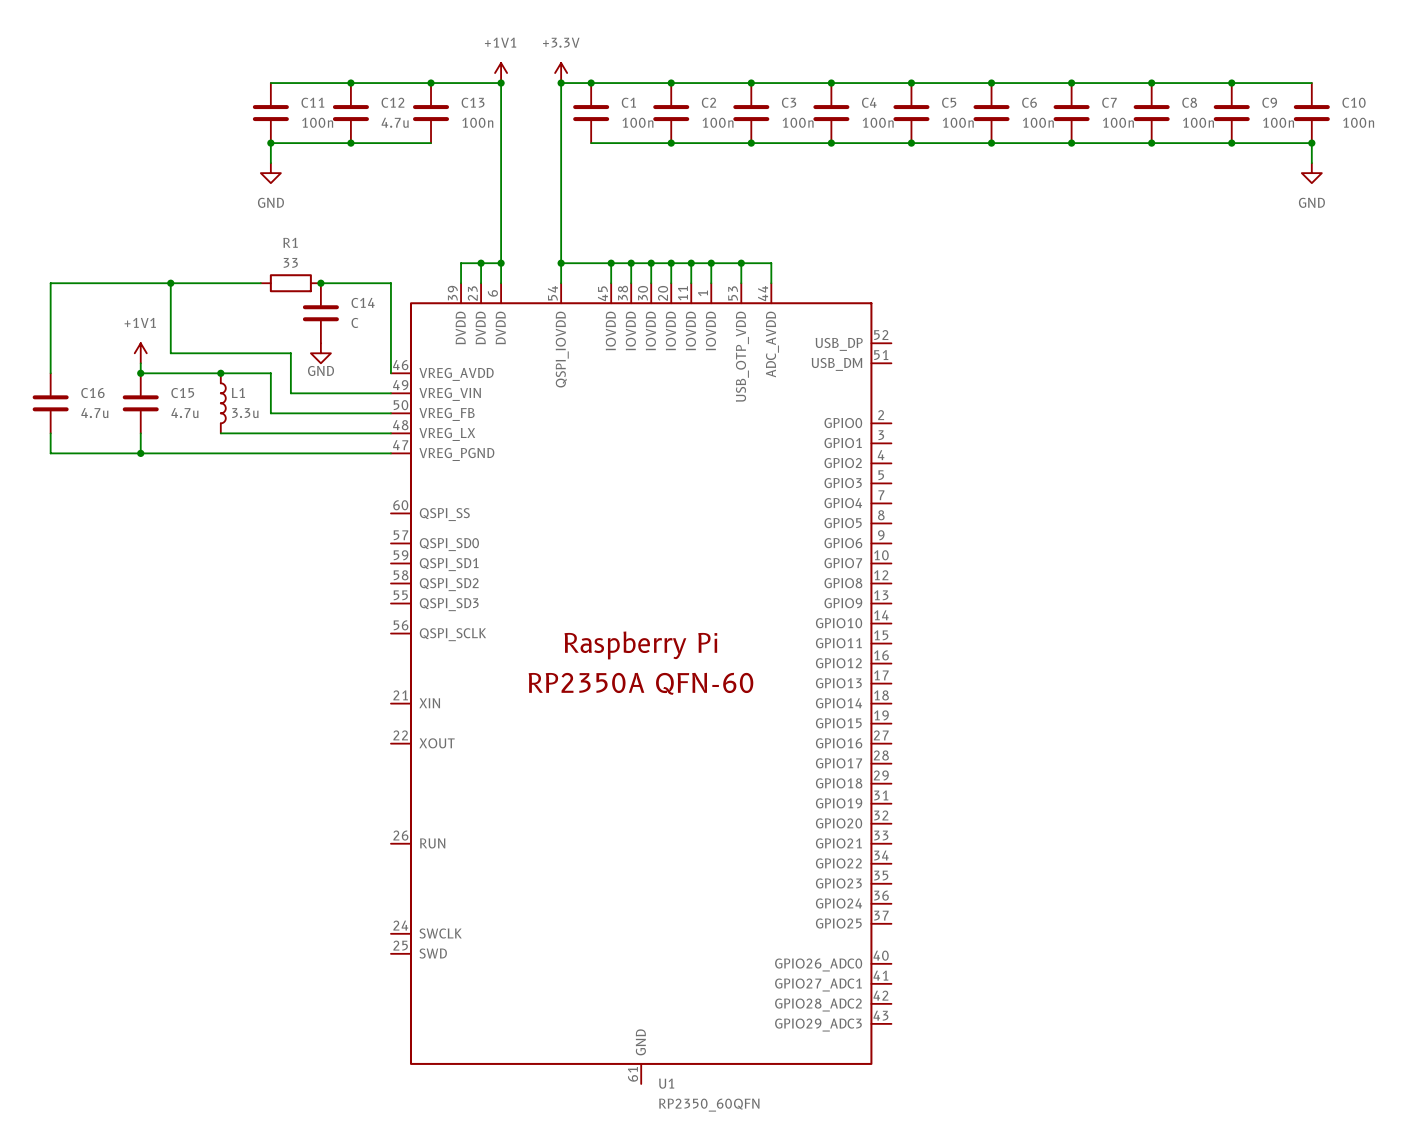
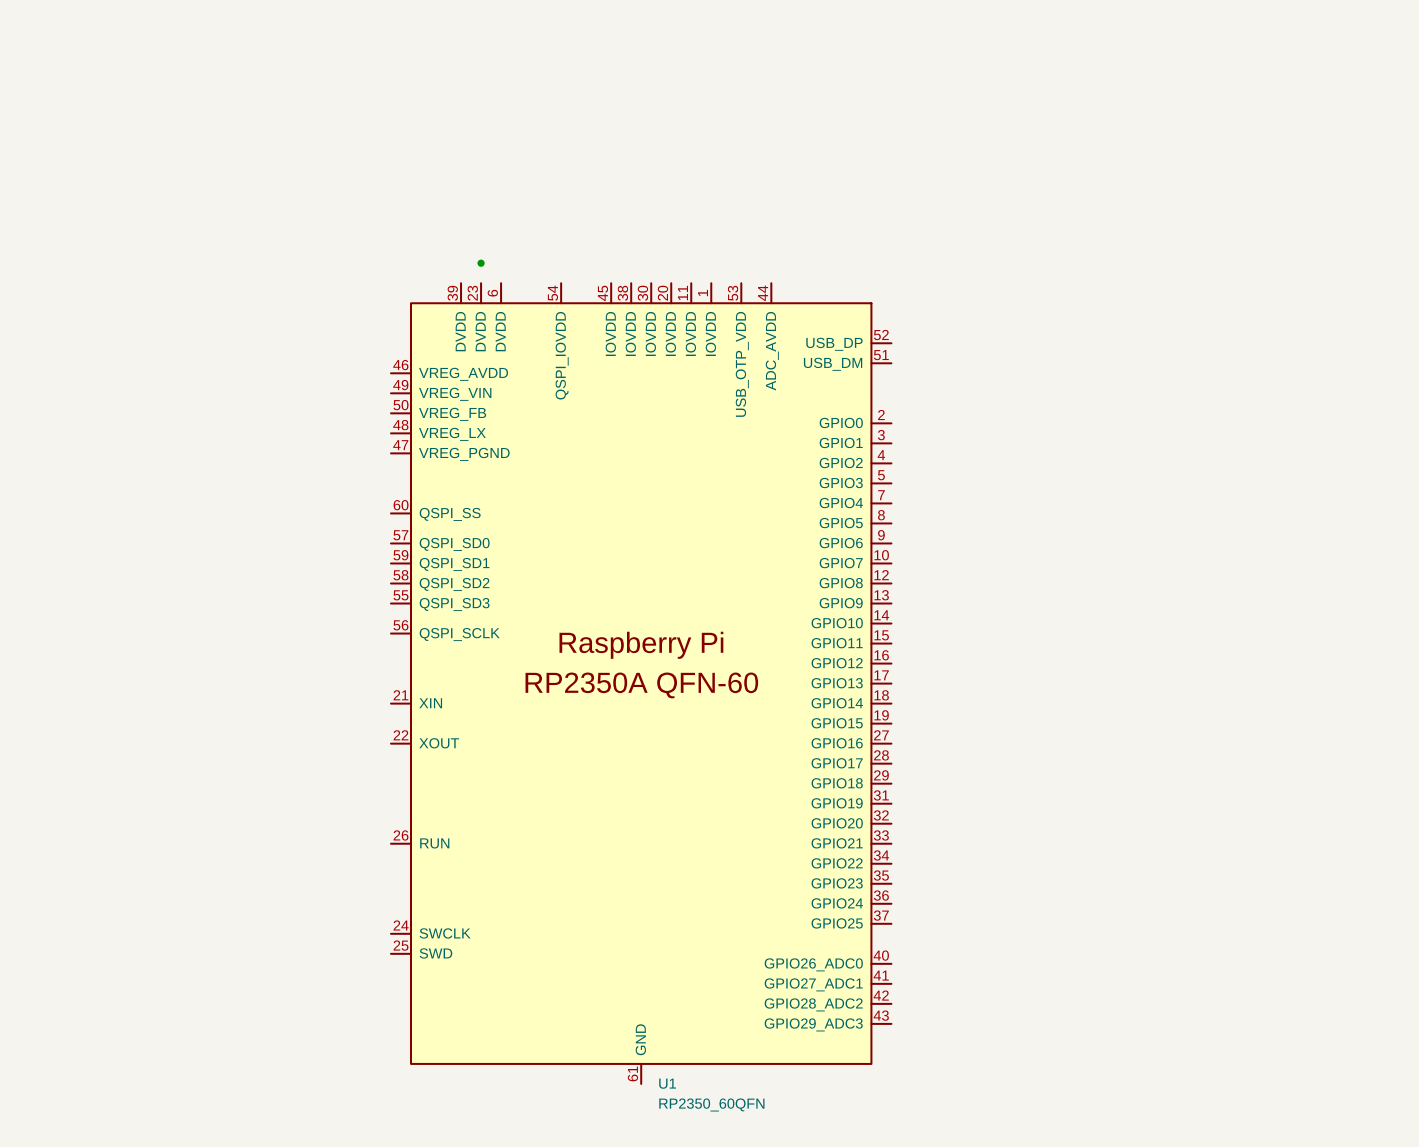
power symbol: +1V1 (501, 73) -> none
power symbol: +3.3V (561, 73) -> none
wire: (270, 83) (501, 83) (501, 283) -> none
junction: (350, 83) -> none
junction: (431, 83) -> none
junction: (501, 83) -> none
junction: (561, 83) -> none
junction: (591, 83) -> none
junction: (671, 83) -> none
junction: (751, 83) -> none
junction: (831, 83) -> none
junction: (911, 83) -> none
junction: (991, 83) -> none
junction: (1071, 83) -> none
junction: (1151, 83) -> none
junction: (1231, 83) -> none
wire: (1311, 83) (561, 83) (561, 283) -> none
C11: 100n (270, 113) -> none
C12: 4.7u (350, 113) -> none
C13: 100n (431, 113) -> none
C1: 100n (591, 113) -> none
C2: 100n (671, 113) -> none
C3: 100n (751, 113) -> none
C4: 100n (831, 113) -> none
C5: 100n (911, 113) -> none
C6: 100n (991, 113) -> none
C7: 100n (1071, 113) -> none
C8: 100n (1151, 113) -> none
C9: 100n (1231, 113) -> none
C10: 100n (1311, 113) -> none
junction: (270, 143) -> none
junction: (350, 143) -> none
wire: (431, 143) (270, 143) (270, 163) -> none
wire: (591, 143) (1311, 143) (1311, 163) -> none
junction: (671, 143) -> none
junction: (751, 143) -> none
junction: (831, 143) -> none
junction: (911, 143) -> none
junction: (991, 143) -> none
junction: (1071, 143) -> none
junction: (1151, 143) -> none
junction: (1231, 143) -> none
junction: (1311, 143) -> none
power symbol: GND (270, 173) -> none
power symbol: GND (1311, 173) -> none
wire: (481, 263) (481, 283) -> none
wire: (501, 263) (461, 263) (461, 283) -> none
junction: (501, 263) -> none
wire: (561, 263) (771, 263) (771, 283) -> none
junction: (561, 263) -> none
wire: (611, 263) (611, 283) -> none
junction: (611, 263) -> none
wire: (631, 263) (631, 283) -> none
junction: (631, 263) -> none
wire: (651, 263) (651, 283) -> none
junction: (651, 263) -> none
wire: (671, 263) (671, 283) -> none
junction: (671, 263) -> none
wire: (691, 263) (691, 283) -> none
junction: (691, 263) -> none
wire: (711, 263) (711, 283) -> none
junction: (711, 263) -> none
wire: (741, 263) (741, 283) -> none
junction: (741, 263) -> none
wire: (170, 283) (170, 353) (290, 353) (290, 393) (390, 393) -> none
junction: (170, 283) -> none
wire: (260, 283) (50, 283) (50, 373) -> none
R1: 33 (290, 283) -> none
wire: (320, 283) (390, 283) (390, 373) -> none
junction: (320, 283) -> none
C14: C (320, 313) -> none
power symbol: +1V1 (140, 353) -> none
power symbol: GND (320, 353) -> none
wire: (140, 363) (140, 373) (270, 373) (270, 413) (390, 413) -> none
junction: (140, 373) -> none
junction: (220, 373) -> none
C16: 4.7u (50, 403) -> none
C15: 4.7u (140, 403) -> none
L1: 3.3u (223, 403) -> none
wire: (50, 433) (50, 453) (390, 453) -> none
wire: (140, 433) (140, 453) -> none
wire: (220, 433) (390, 433) -> none
junction: (140, 453) -> none

